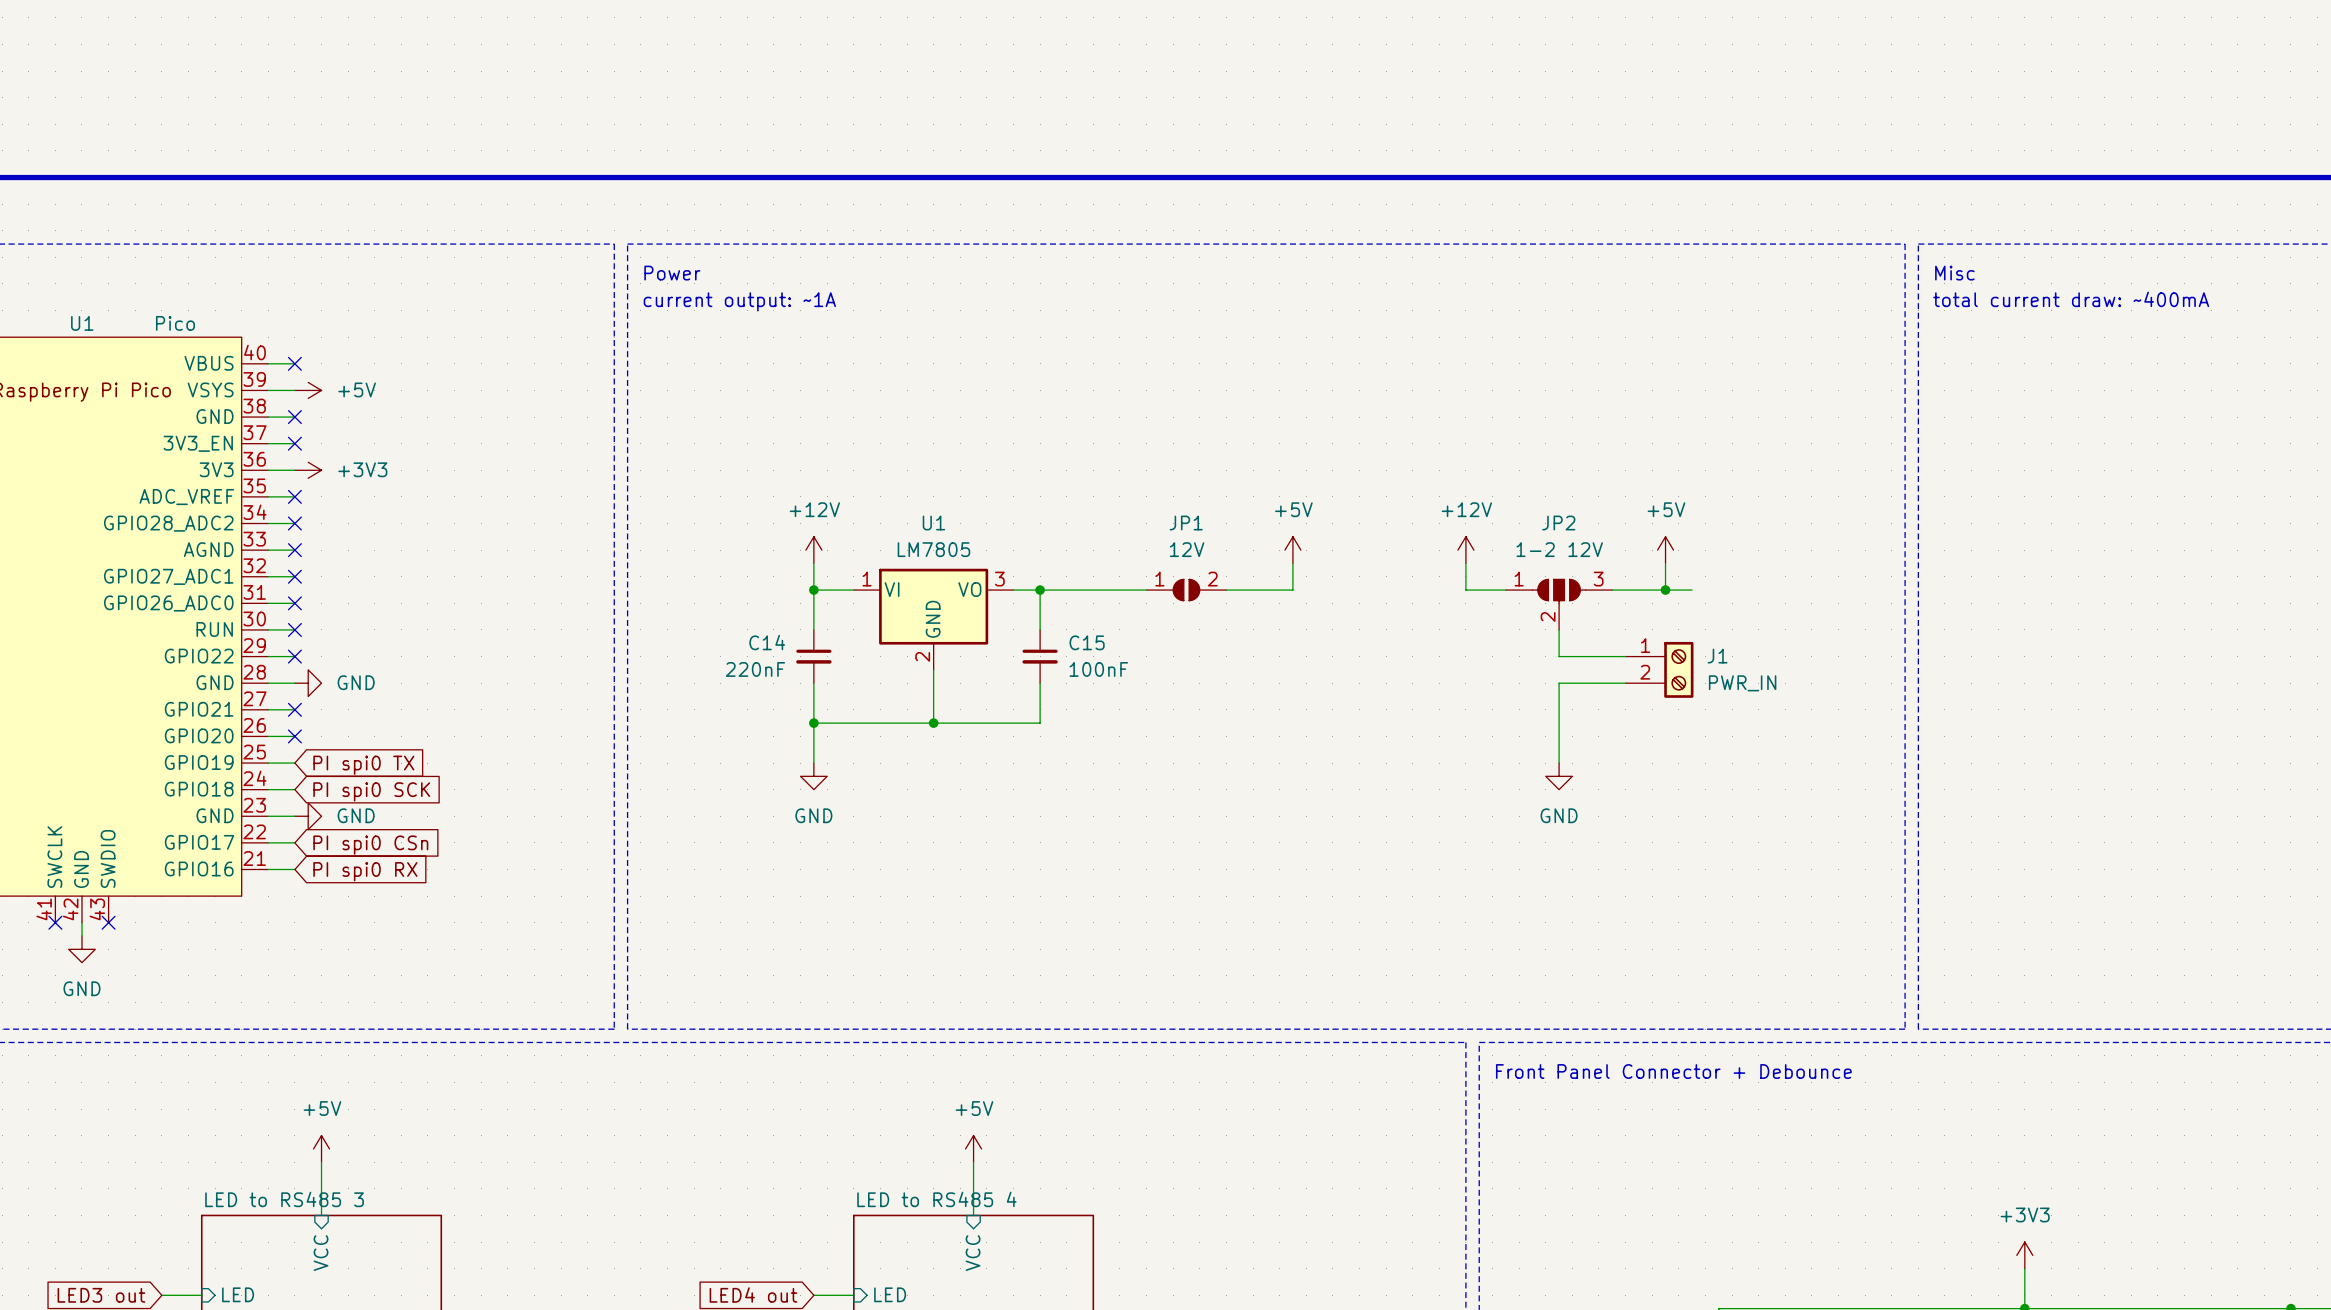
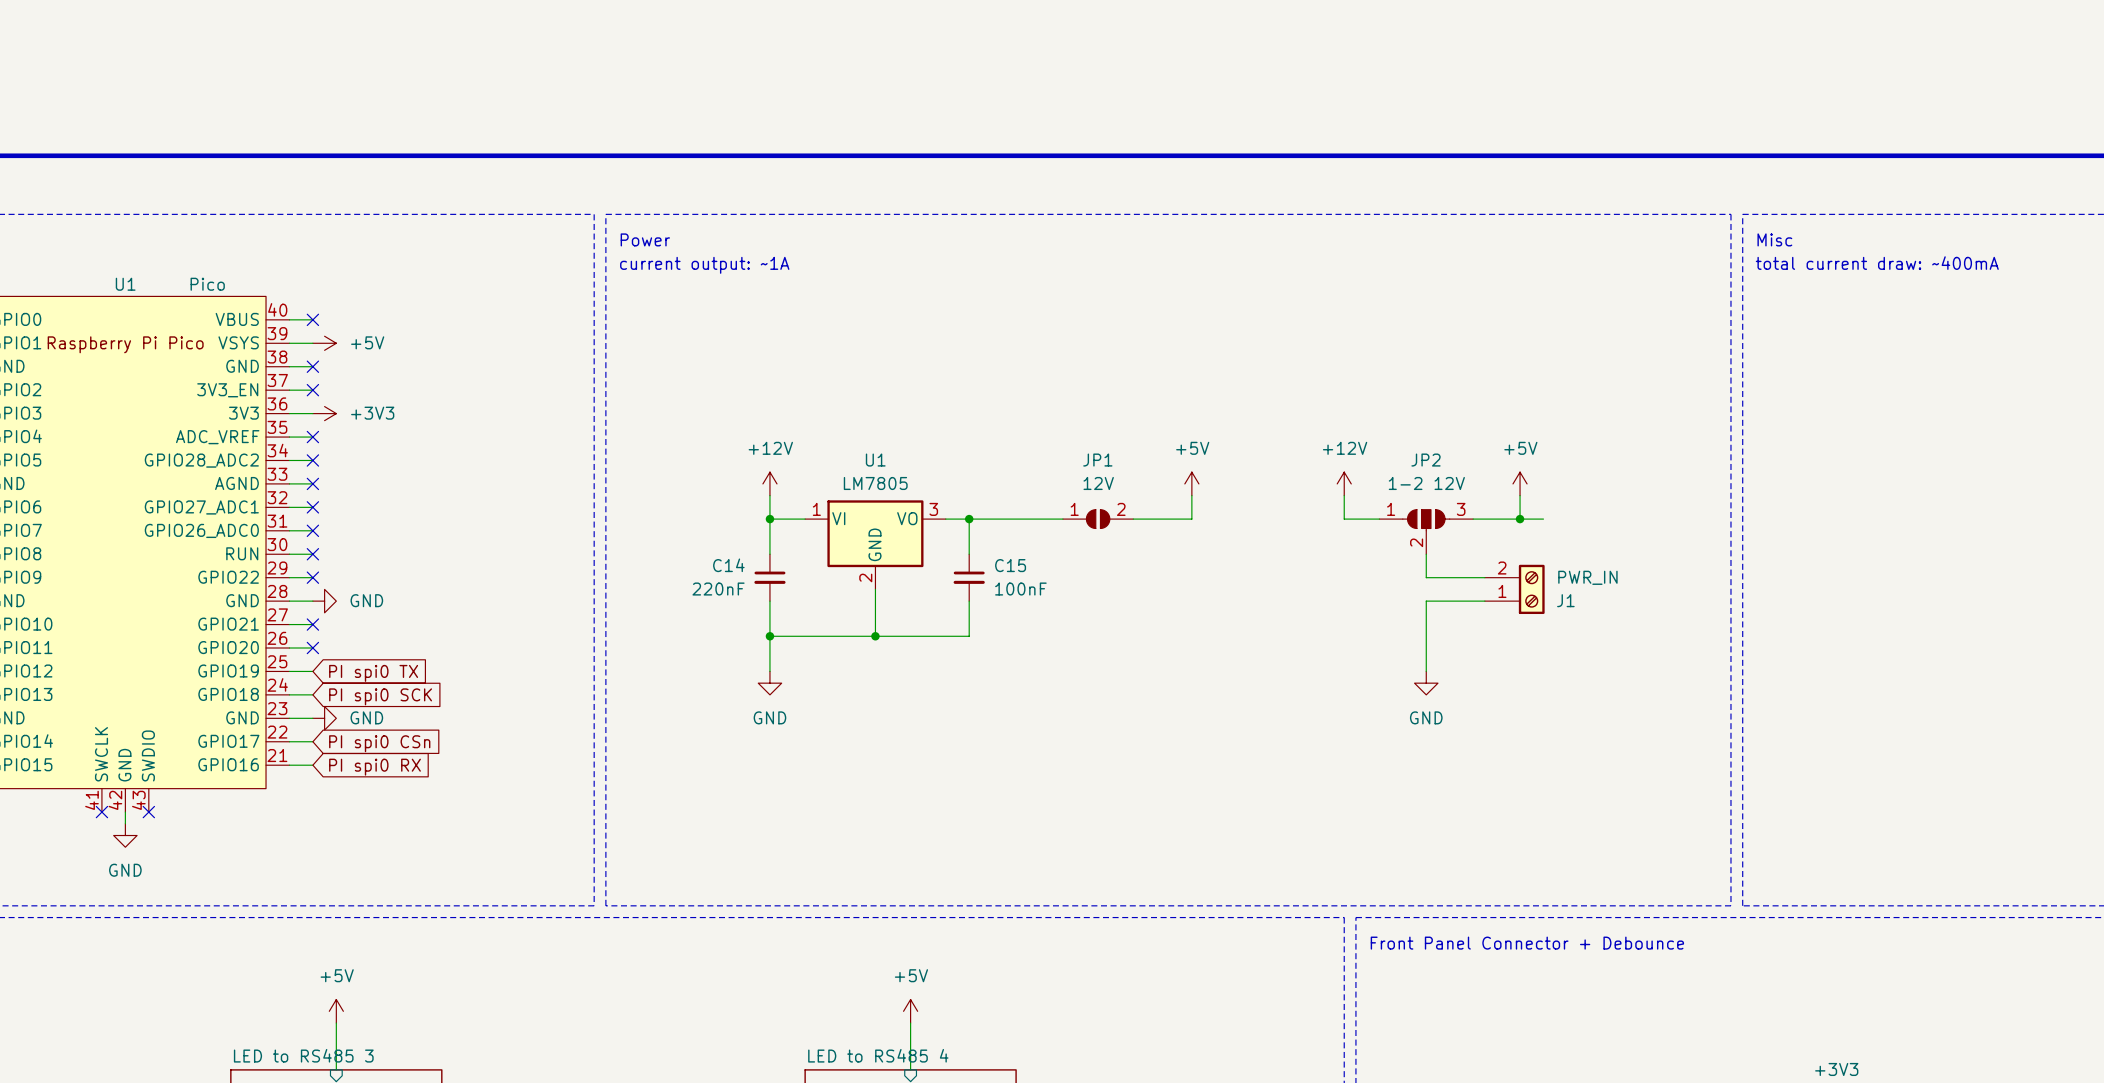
J1 flip: as is (1678, 669) -> up-down (1531, 589)

